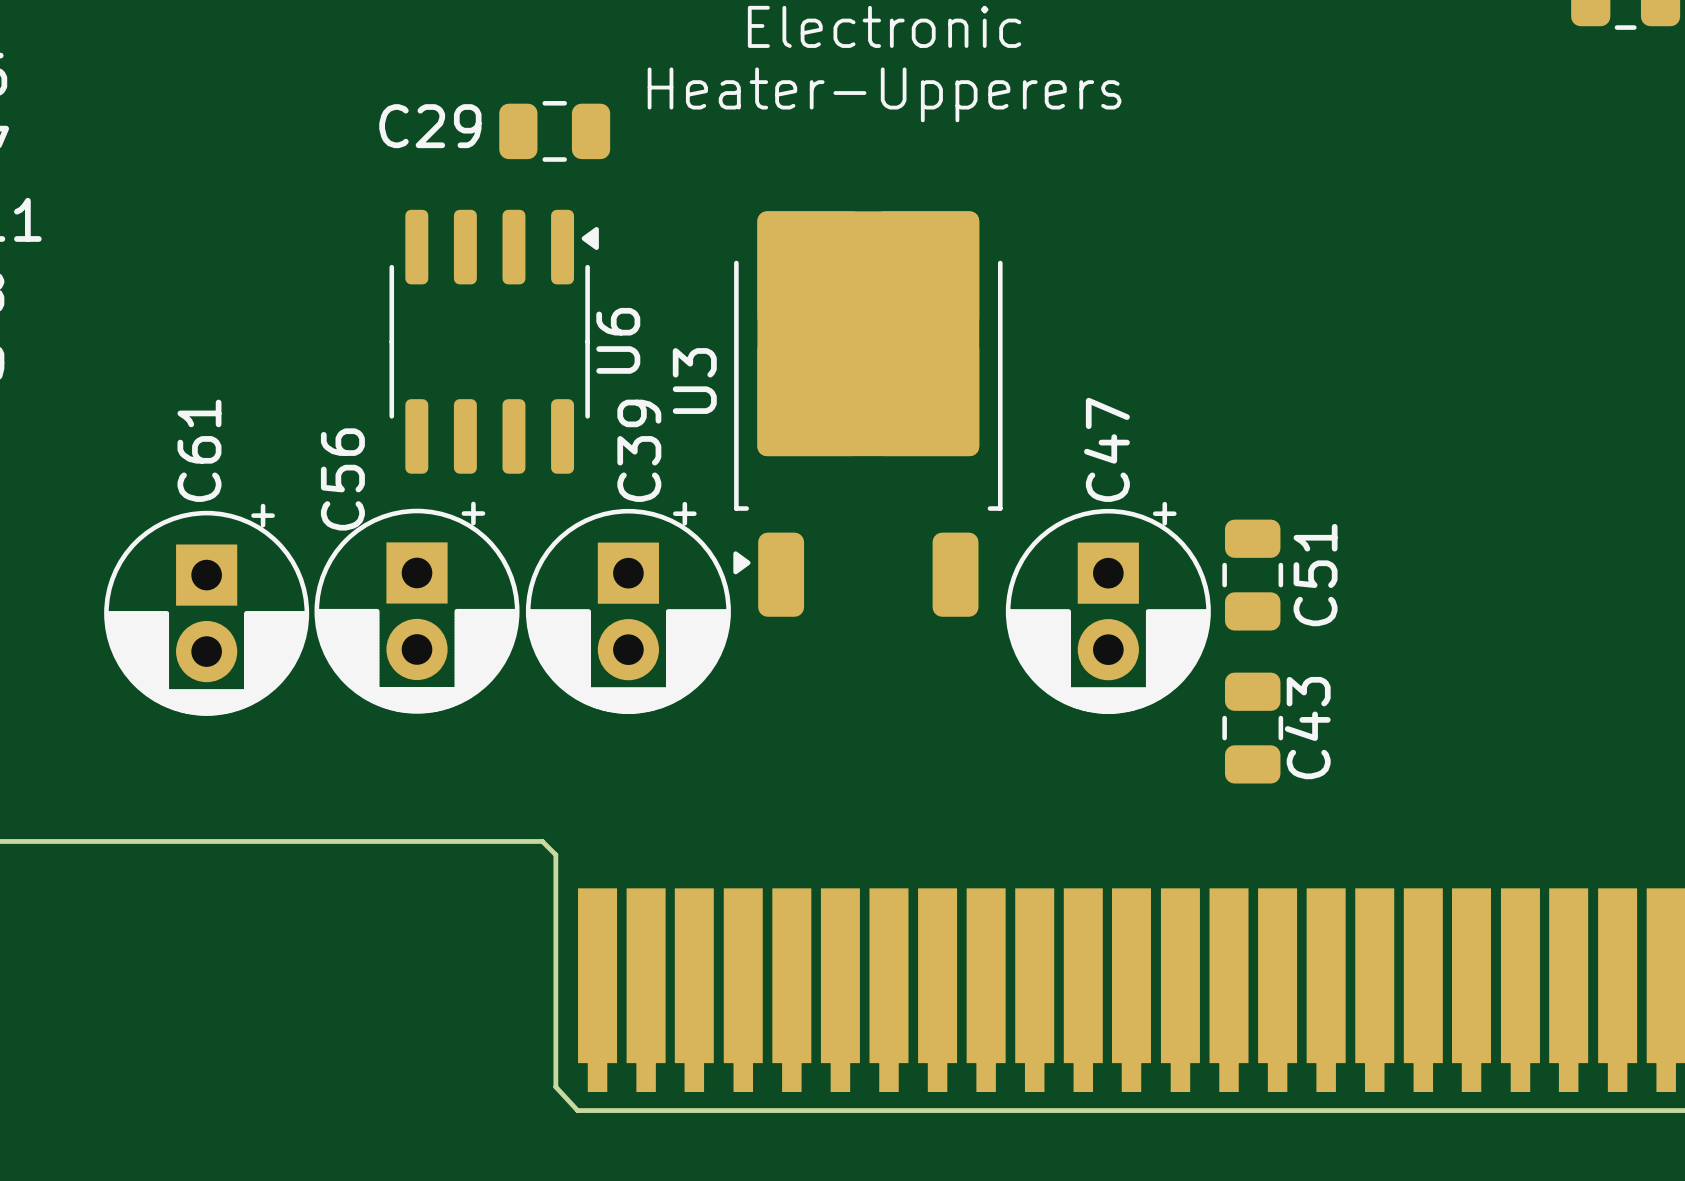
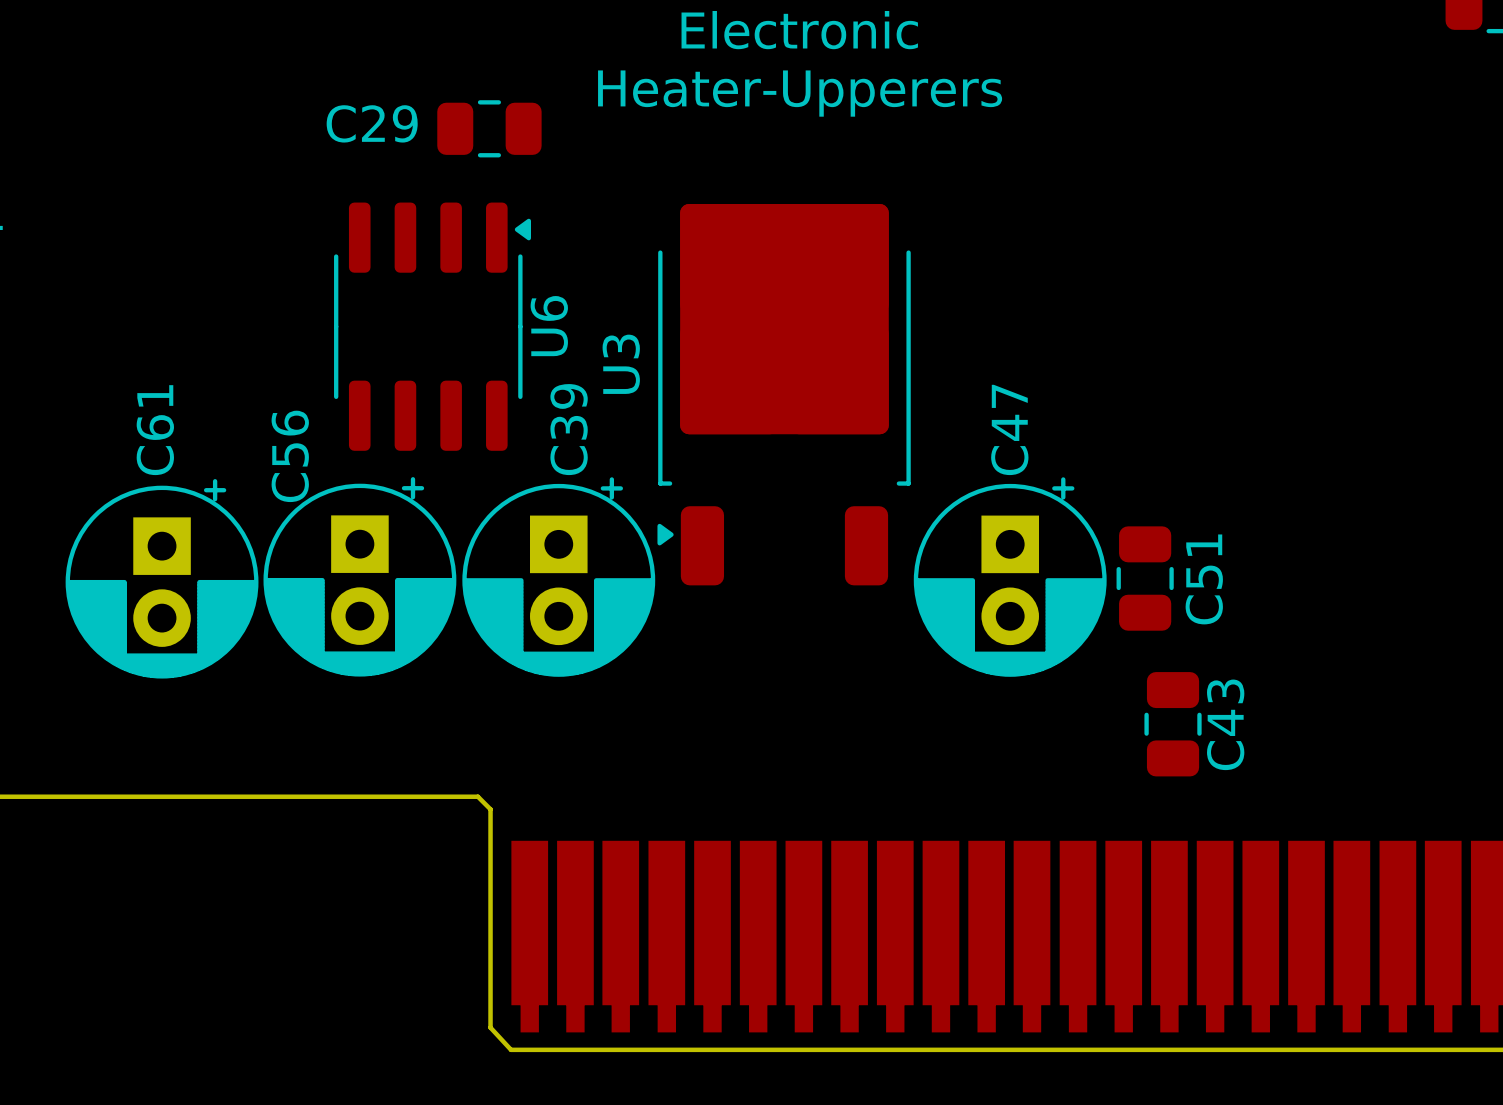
C51 position: (1252, 575) -> (1145, 578)
C43 position: (1252, 728) -> (1173, 724)

